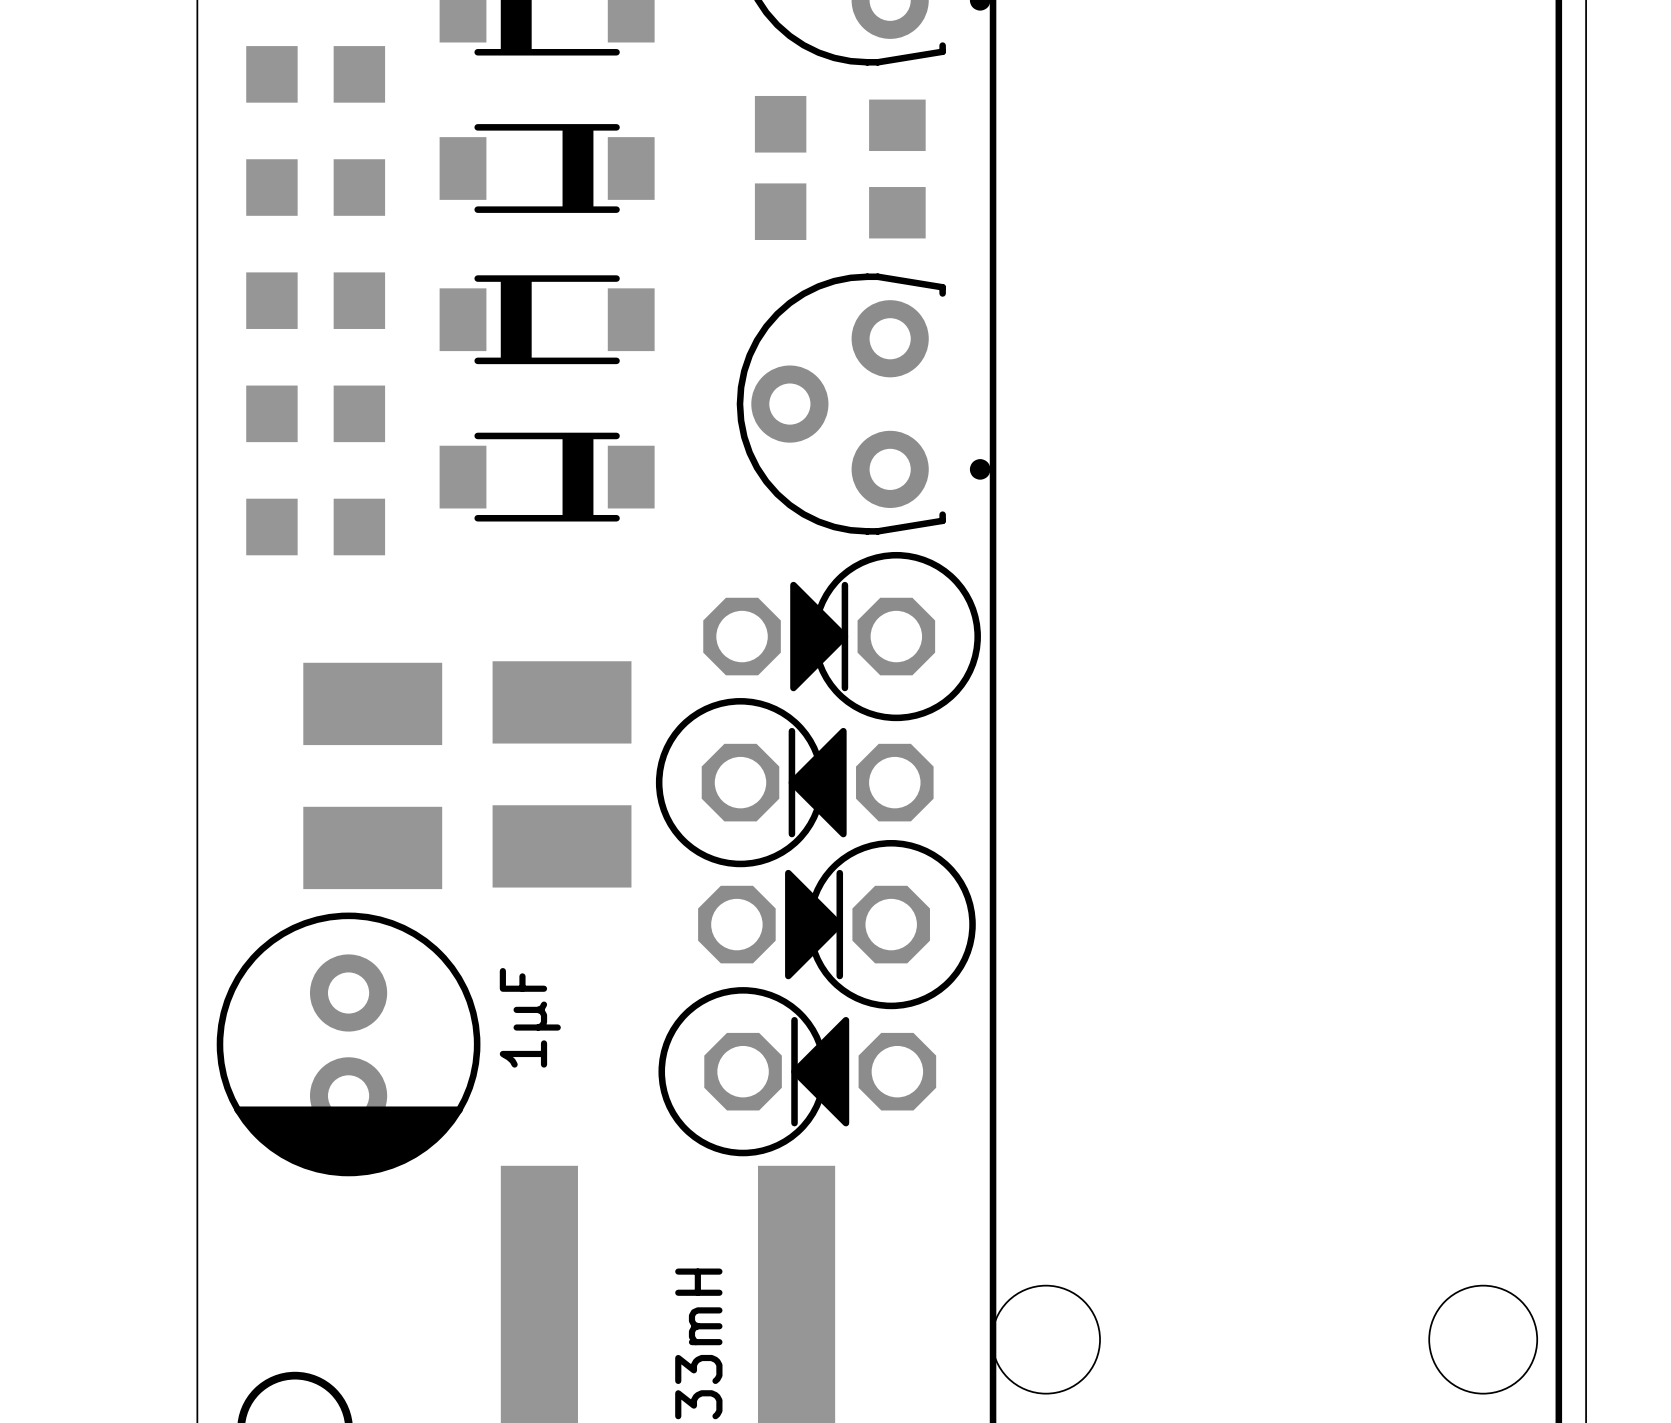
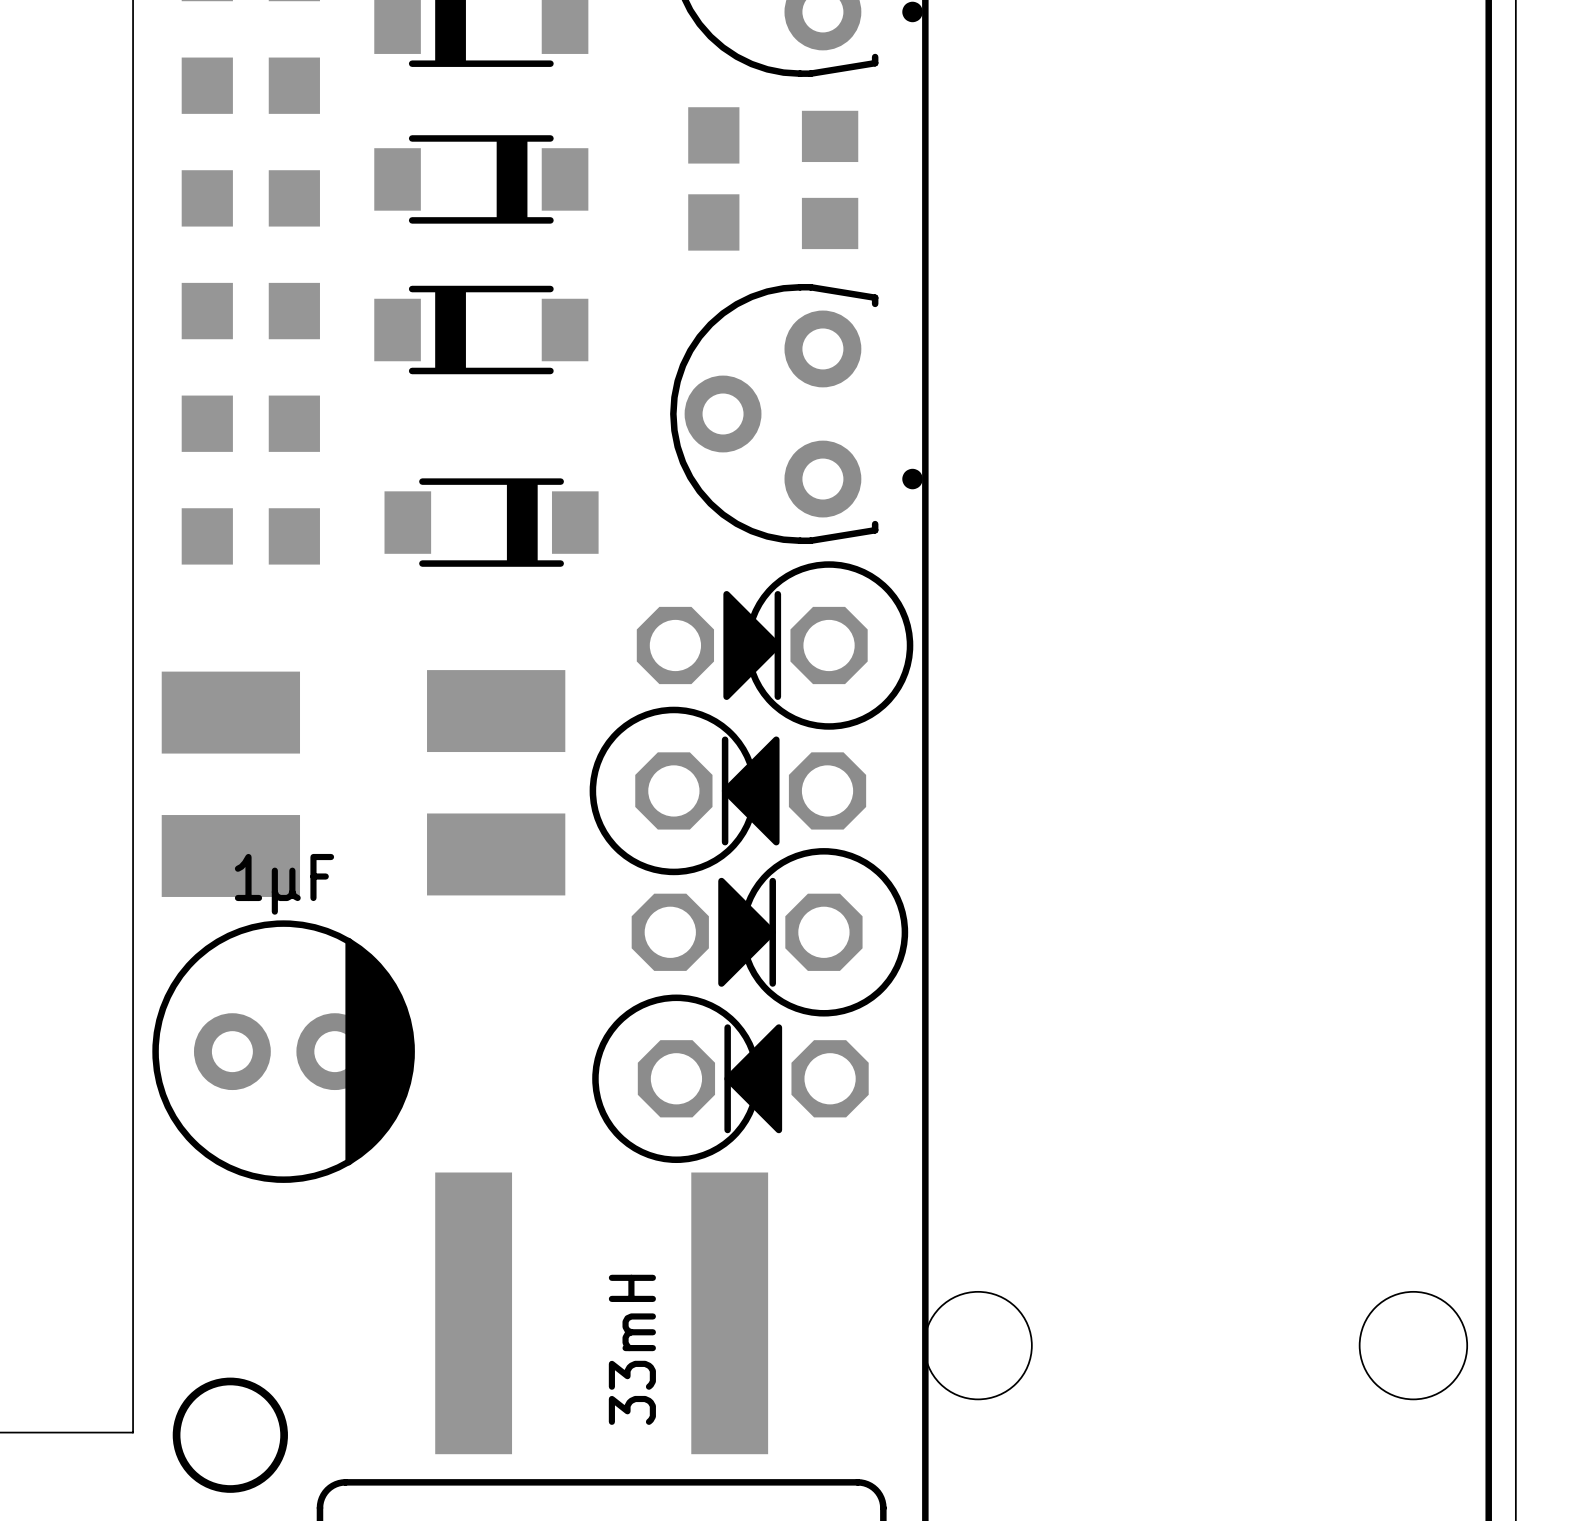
part position: (547, 477) -> (491, 522)
part position: (372, 775) -> (230, 784)
part rotation: 0° (348, 1044) -> 90° counterclockwise (283, 1051)

